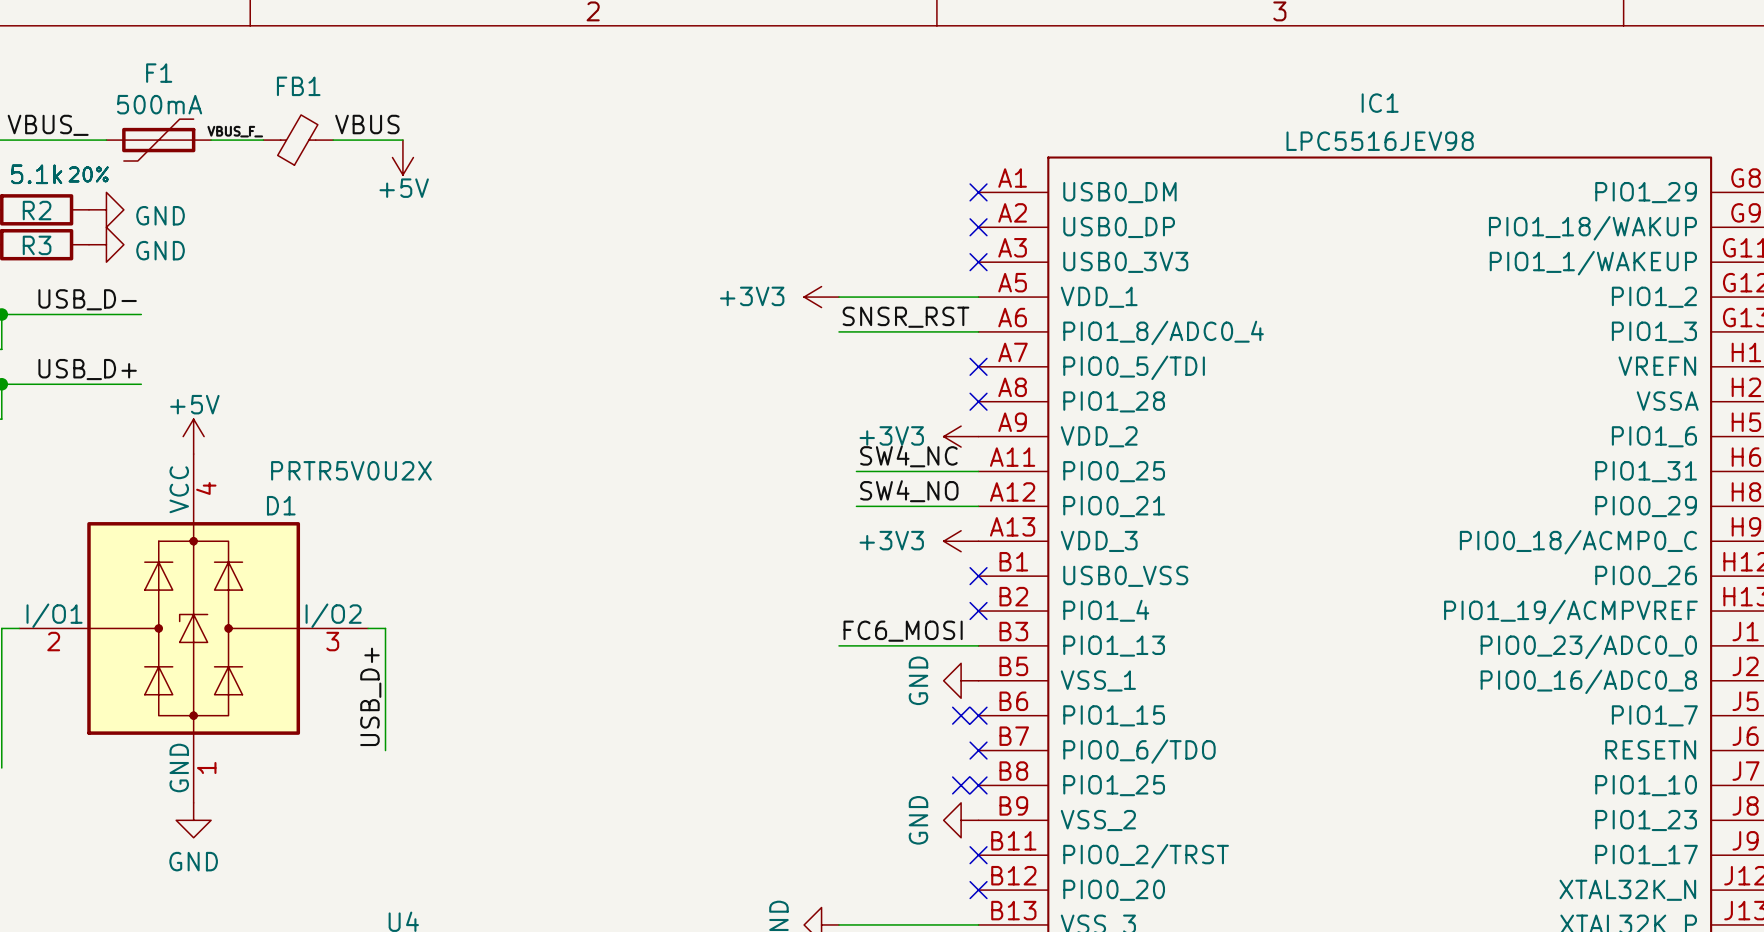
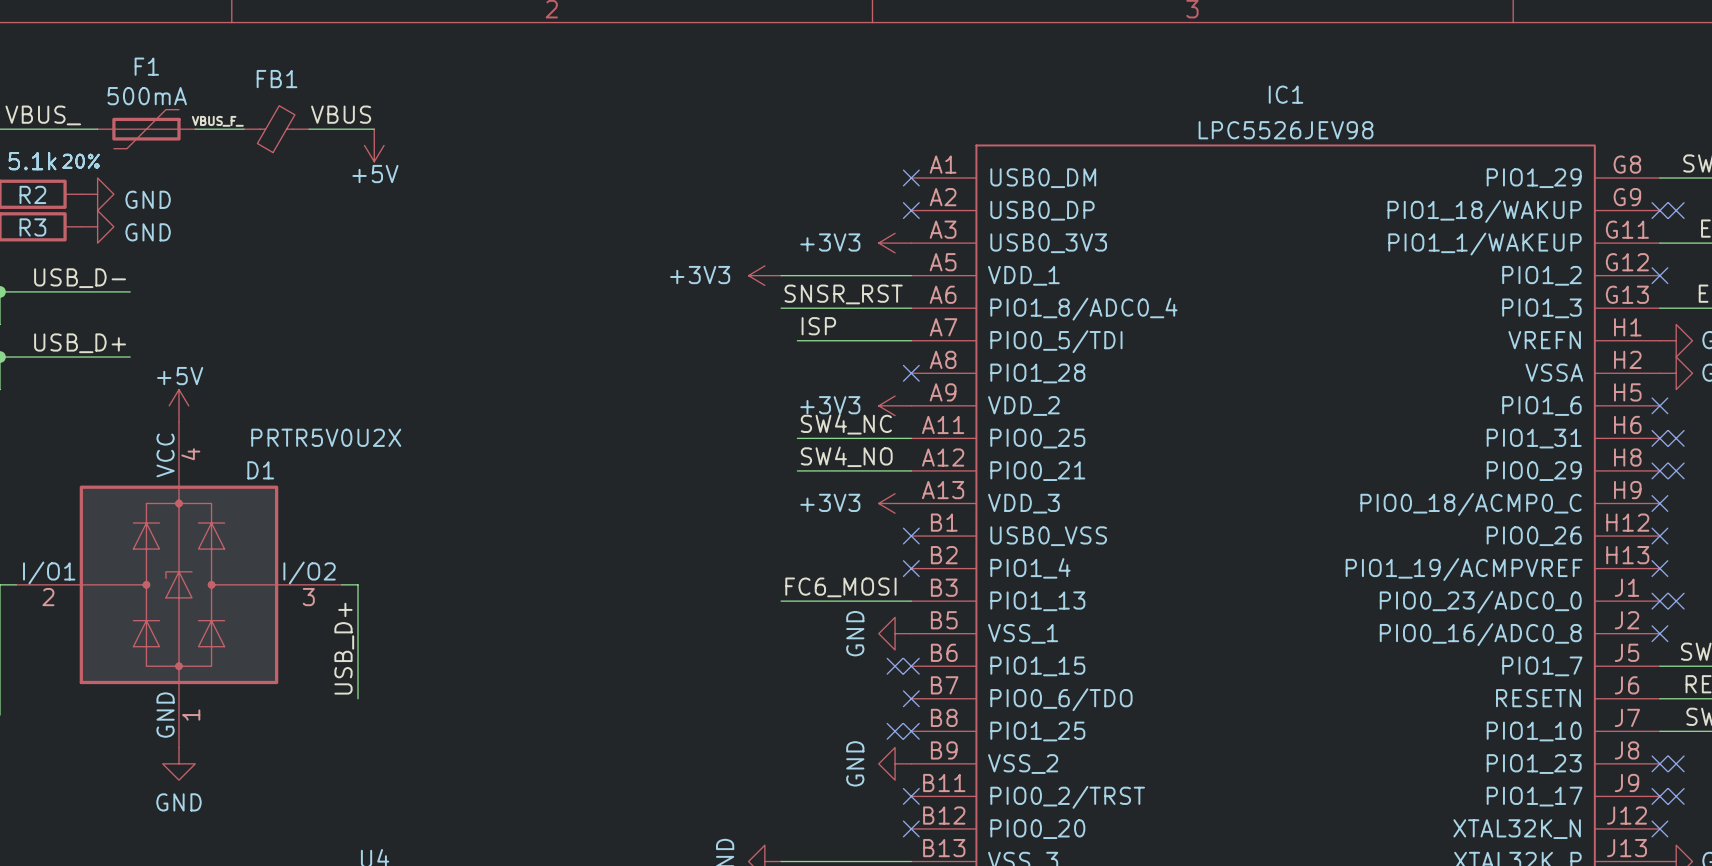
IC1 value: LPC5516JEV98 (1380, 141) -> LPC5526JEV98 (1286, 130)
power symbol: none -> +3V3 (895, 243)
no-connect mark: (978, 262) -> none
label: none -> ISP (818, 326)
wire: none -> (797, 340) (911, 340)
no-connect mark: (978, 366) -> none

